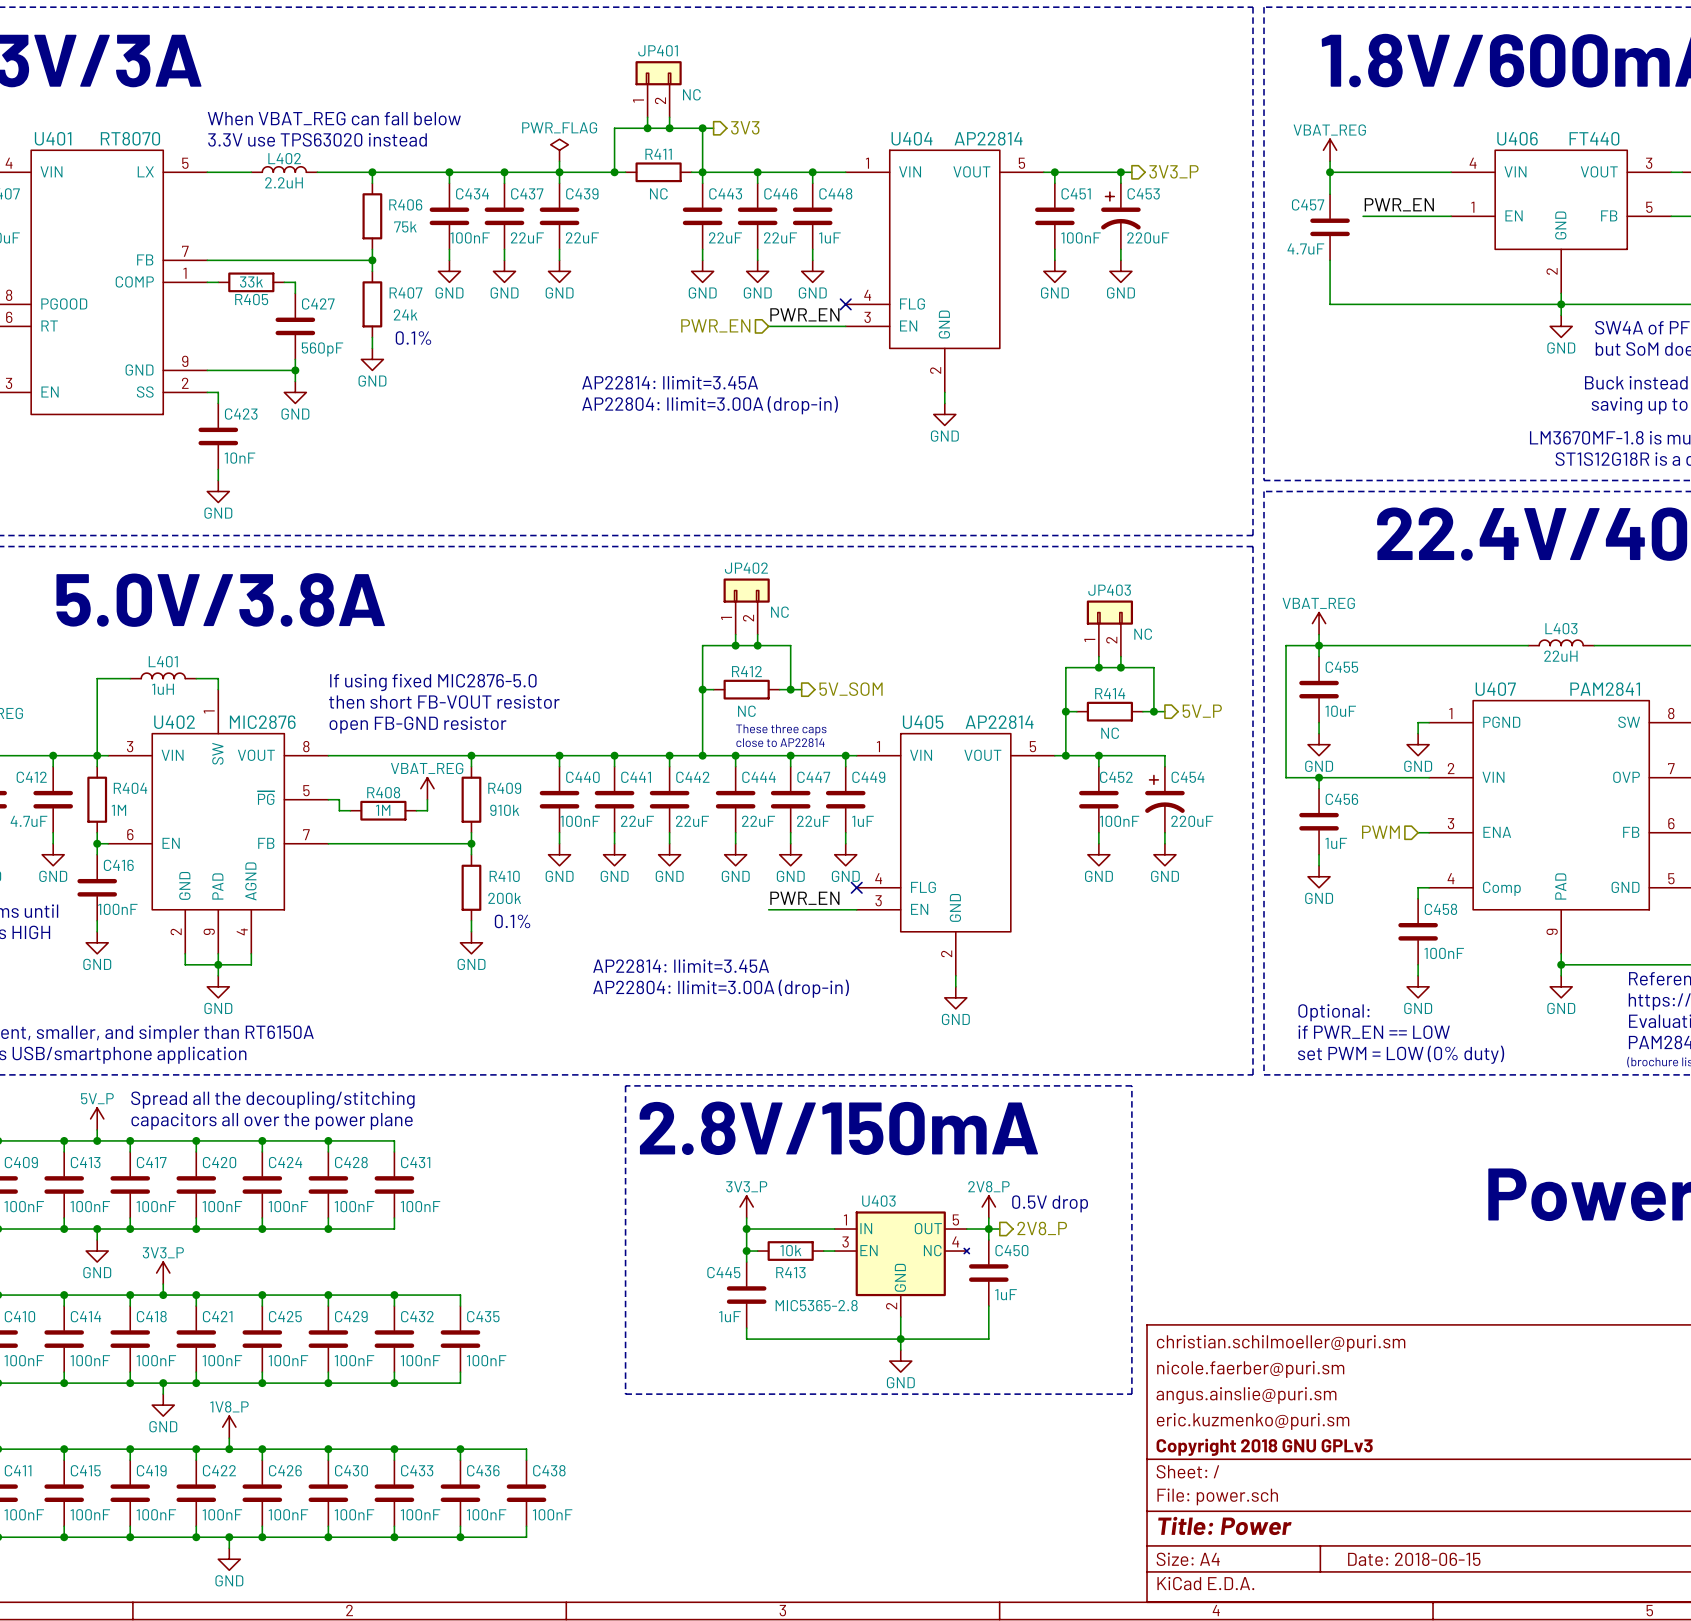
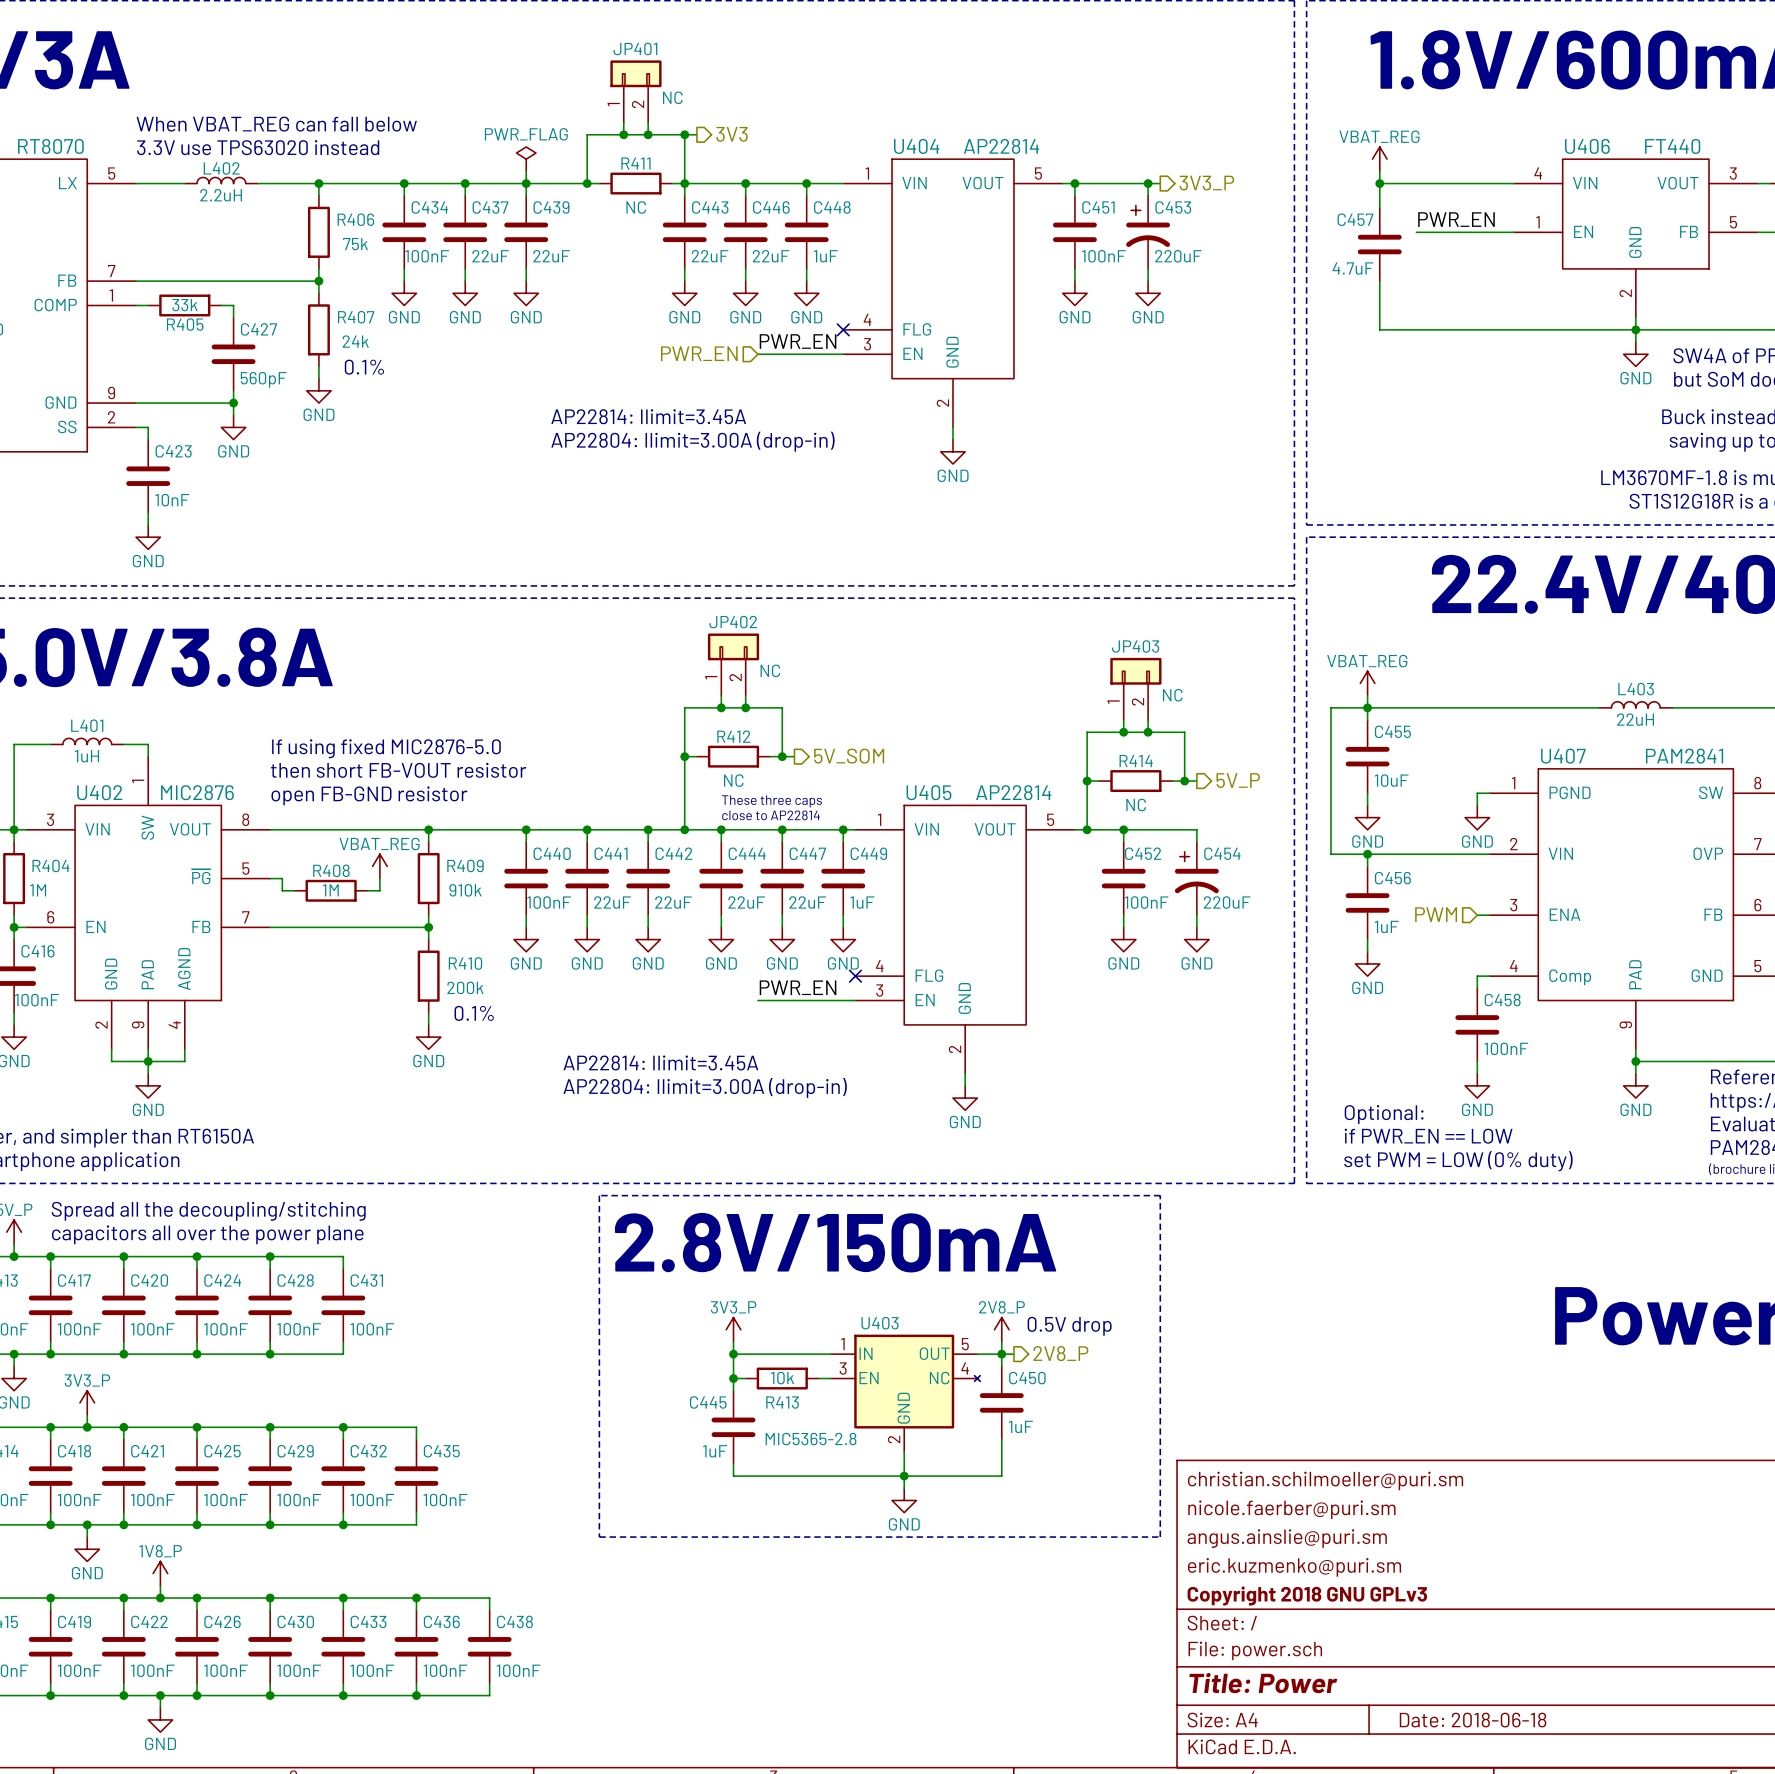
title block: Date: 2018-06-15 (1414, 1559) -> Date: 2018-06-18 (1473, 1720)

